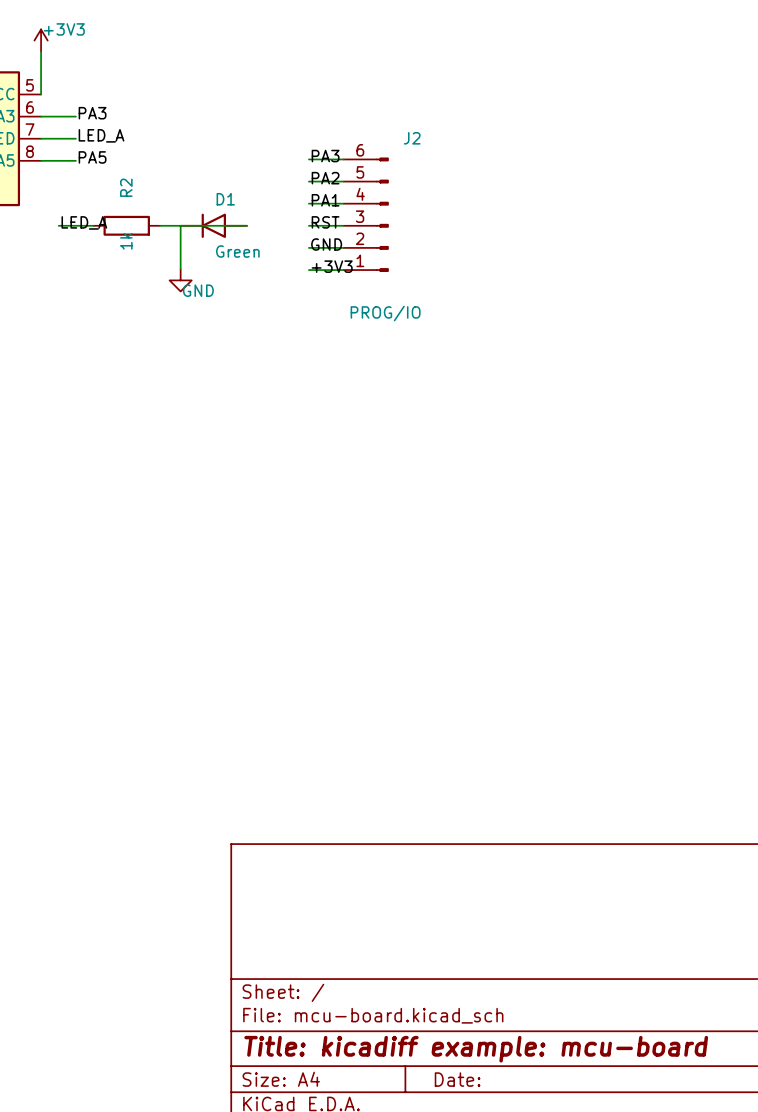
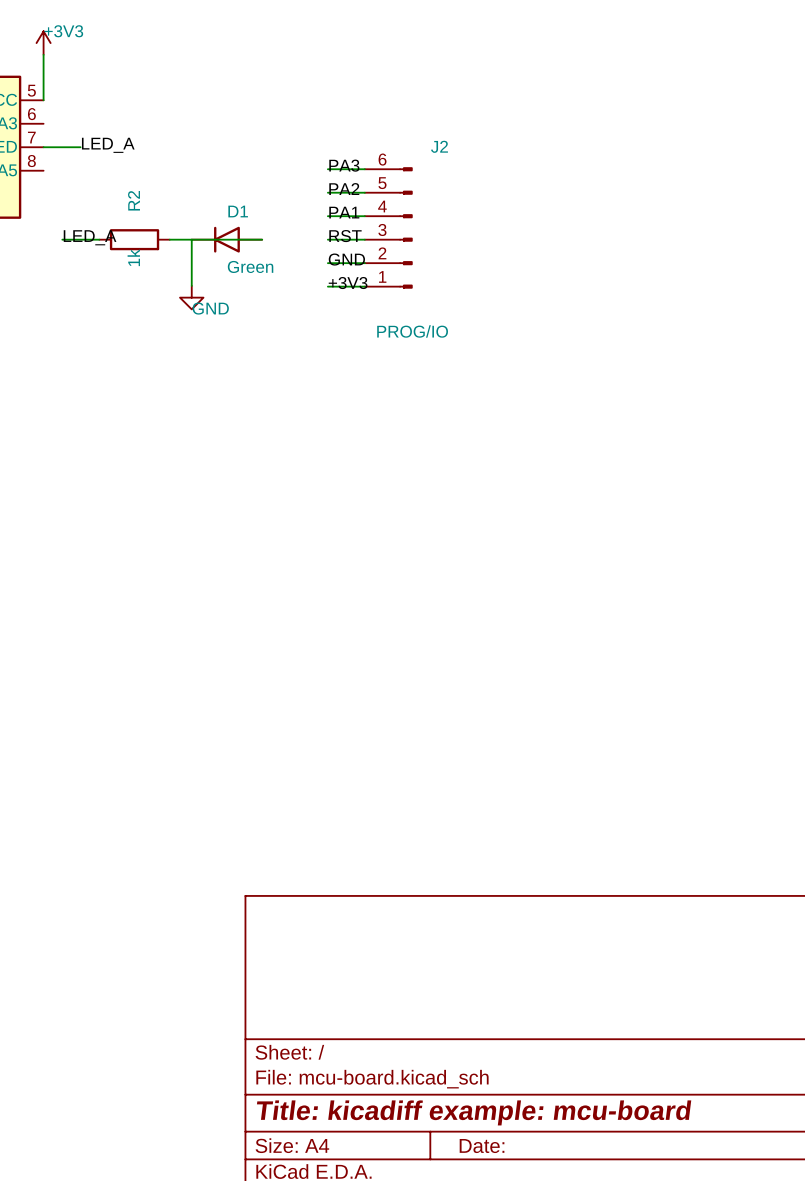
label: PA3 (92, 113) -> none
wire: (41, 116) (75, 116) -> none
label: PA5 (92, 157) -> none
wire: (41, 160) (75, 160) -> none

